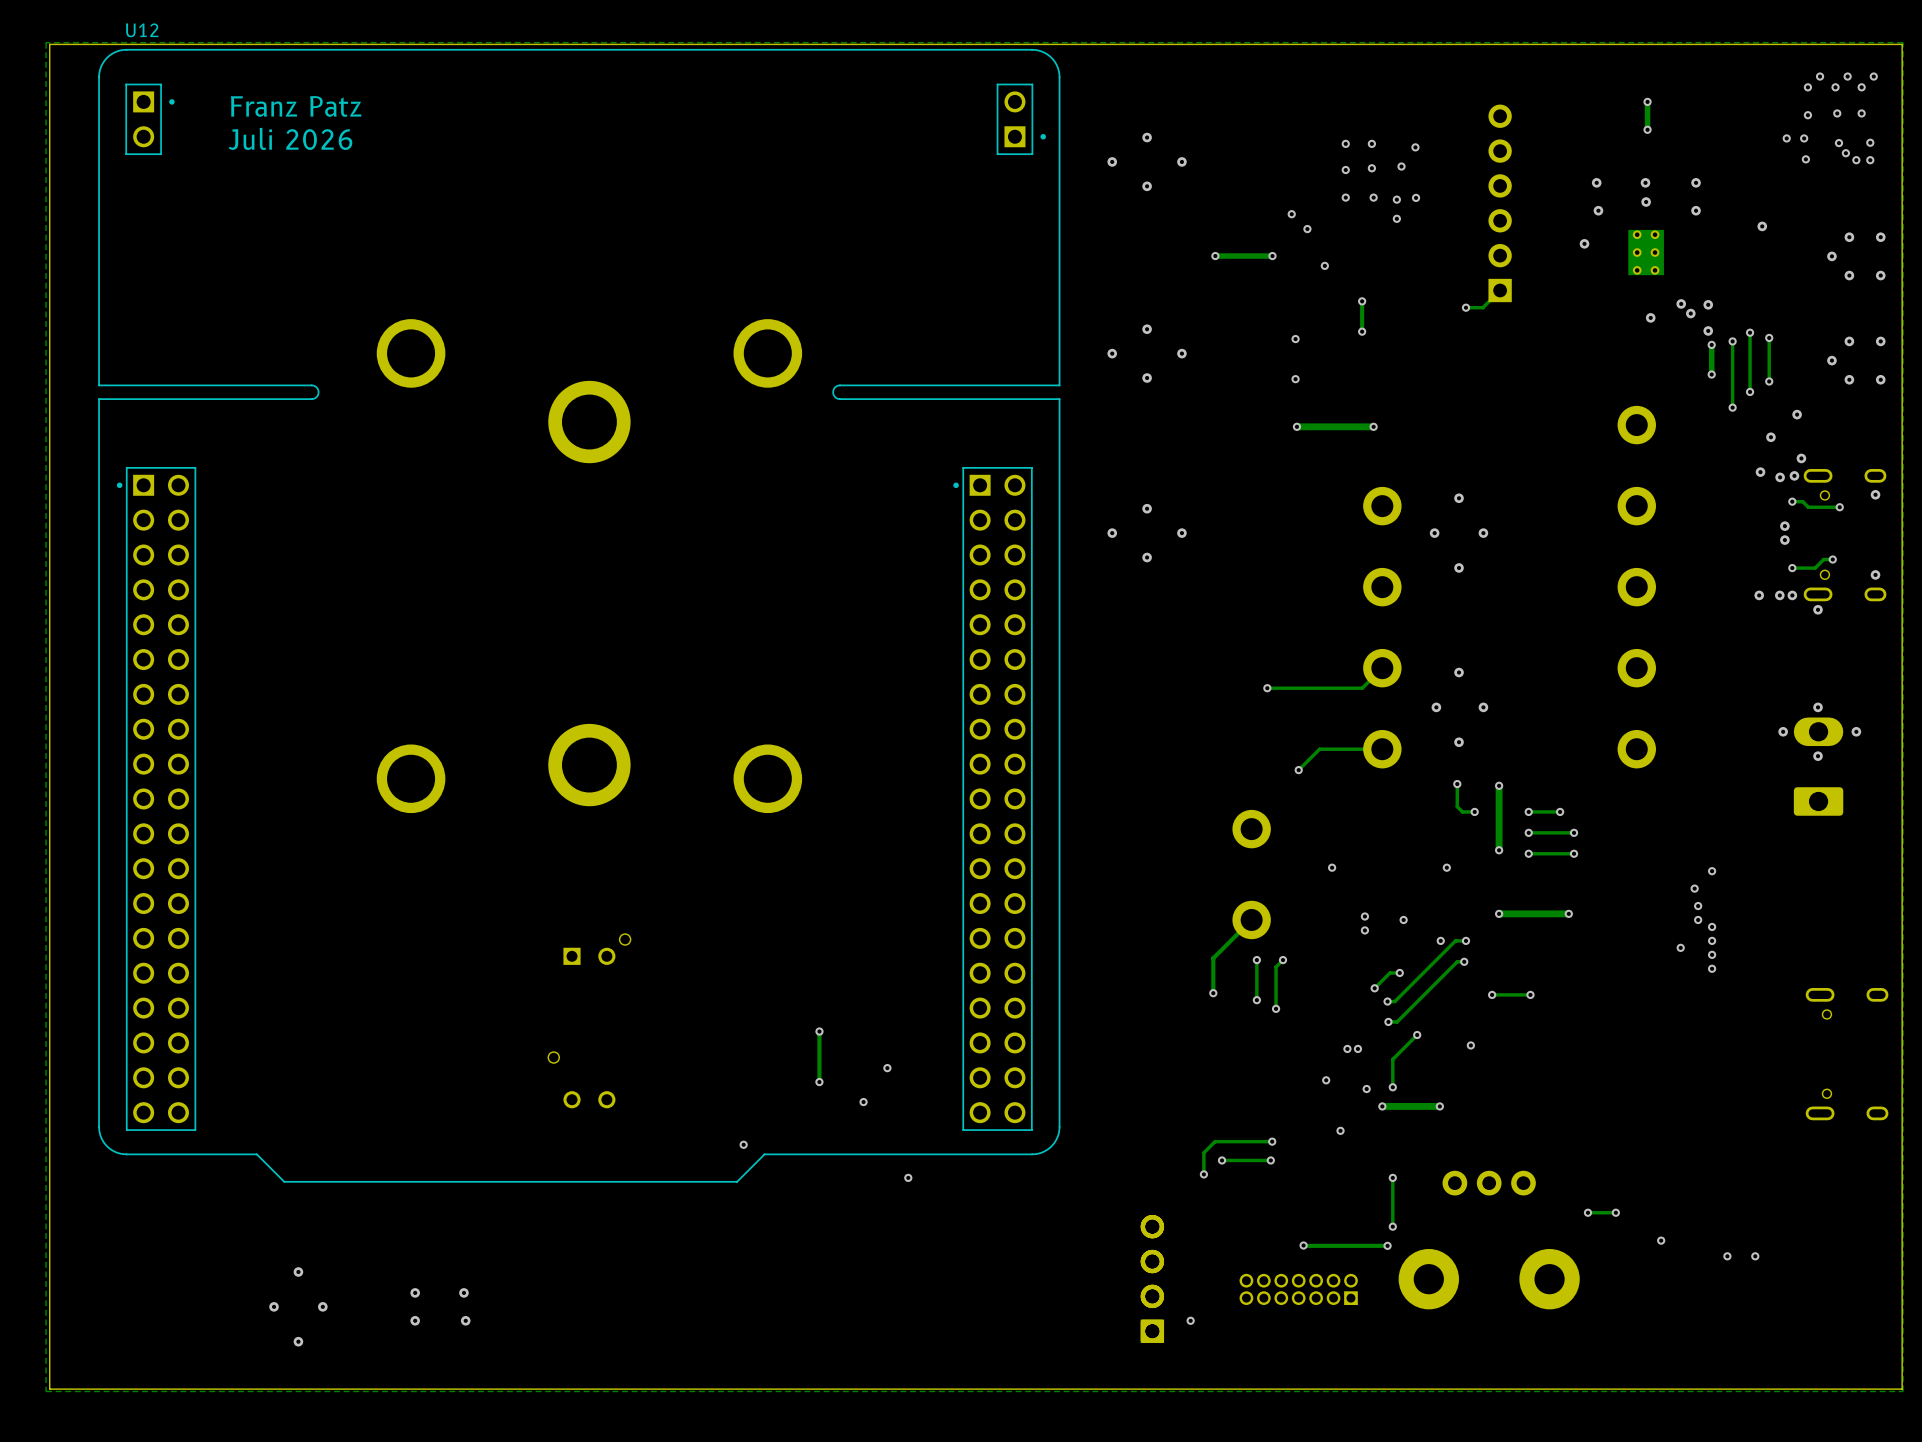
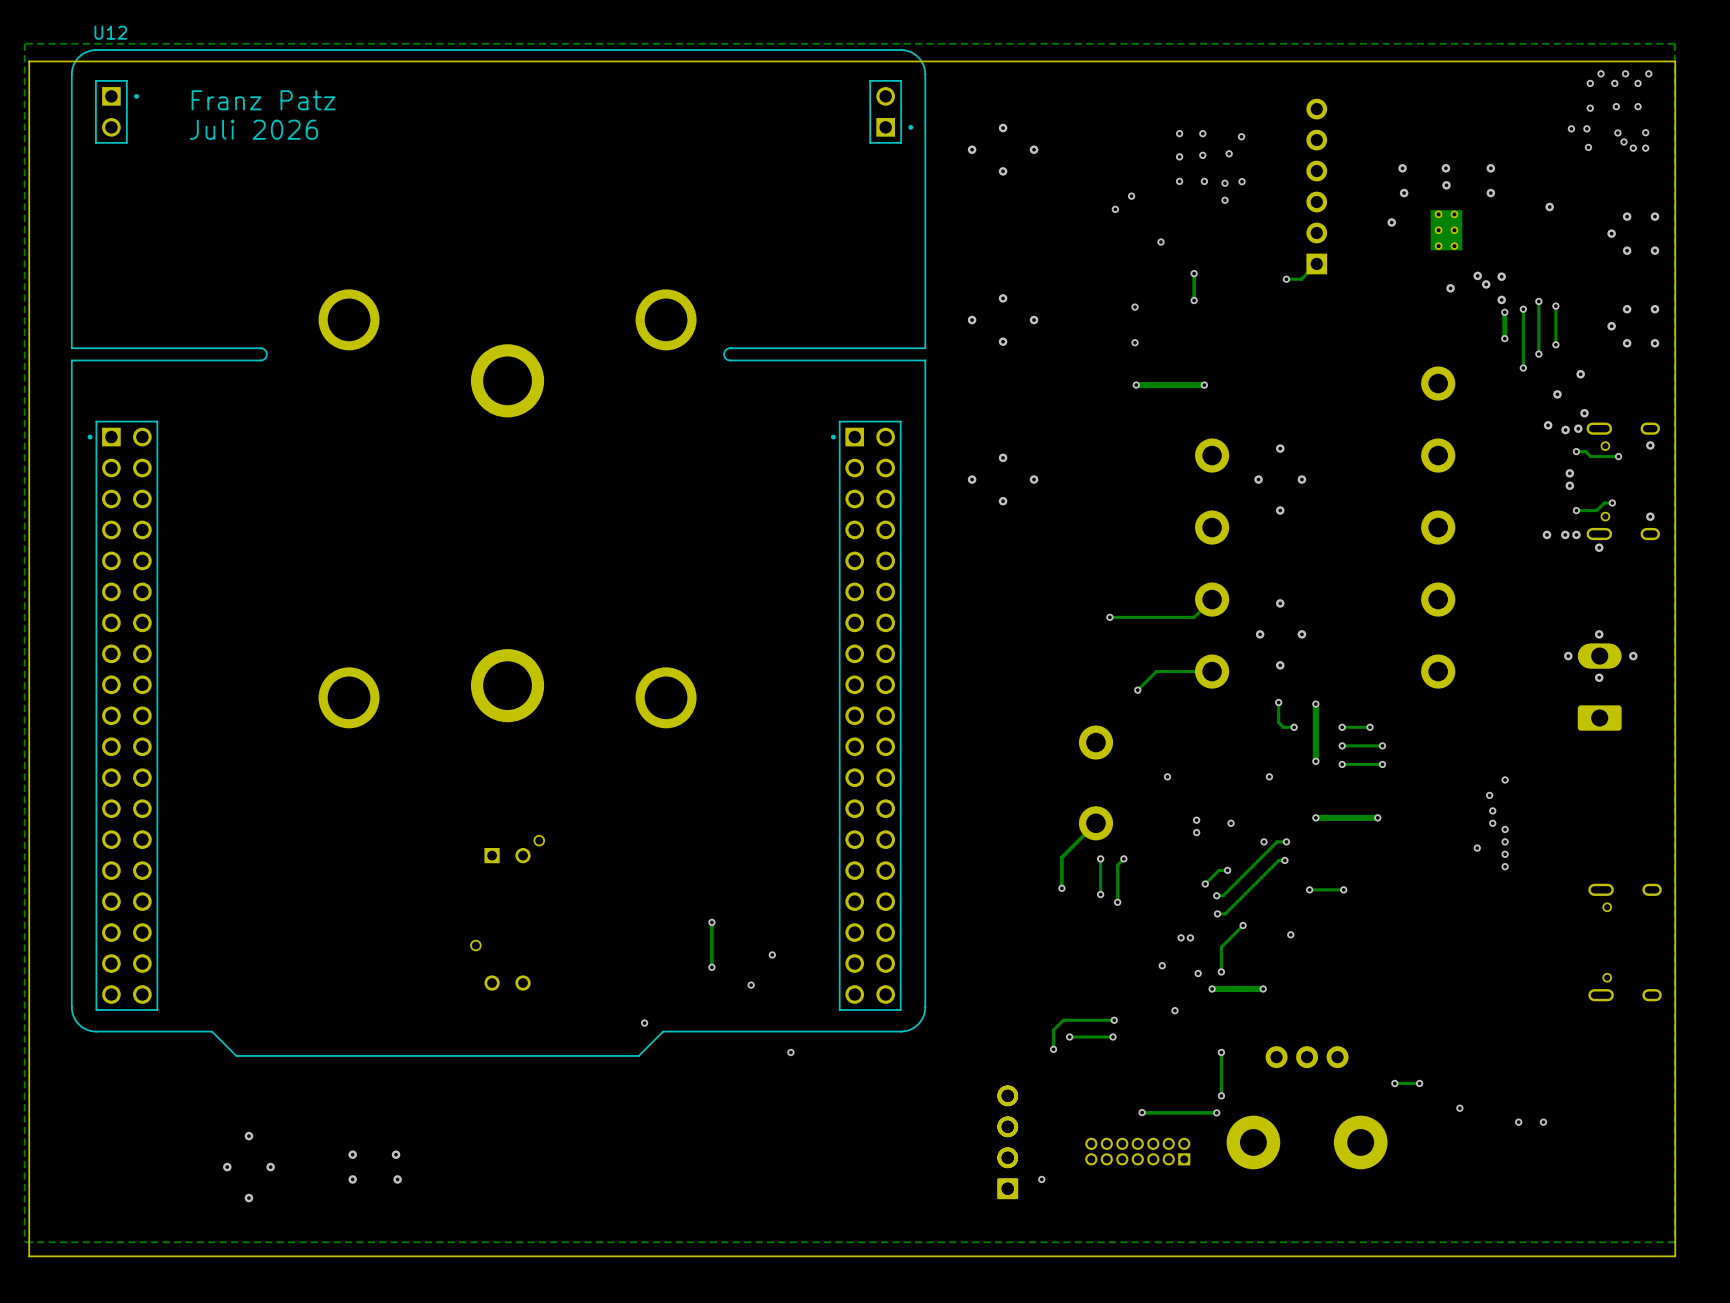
board edge: (1902, 44) (49, 44) (49, 1389) (1902, 1389) (1902, 44) -> (1675, 61) (29, 61) (29, 1256) (1675, 1256) (1675, 61)
track: (1647, 101) (1647, 129) -> none
via: (1647, 101) -> none
via: (1647, 129) -> none
via: none -> (1115, 209)
via: (1307, 229) -> none
via: (1215, 256) -> none
track: (1272, 256) (1215, 256) -> none
via: (1272, 256) -> none

